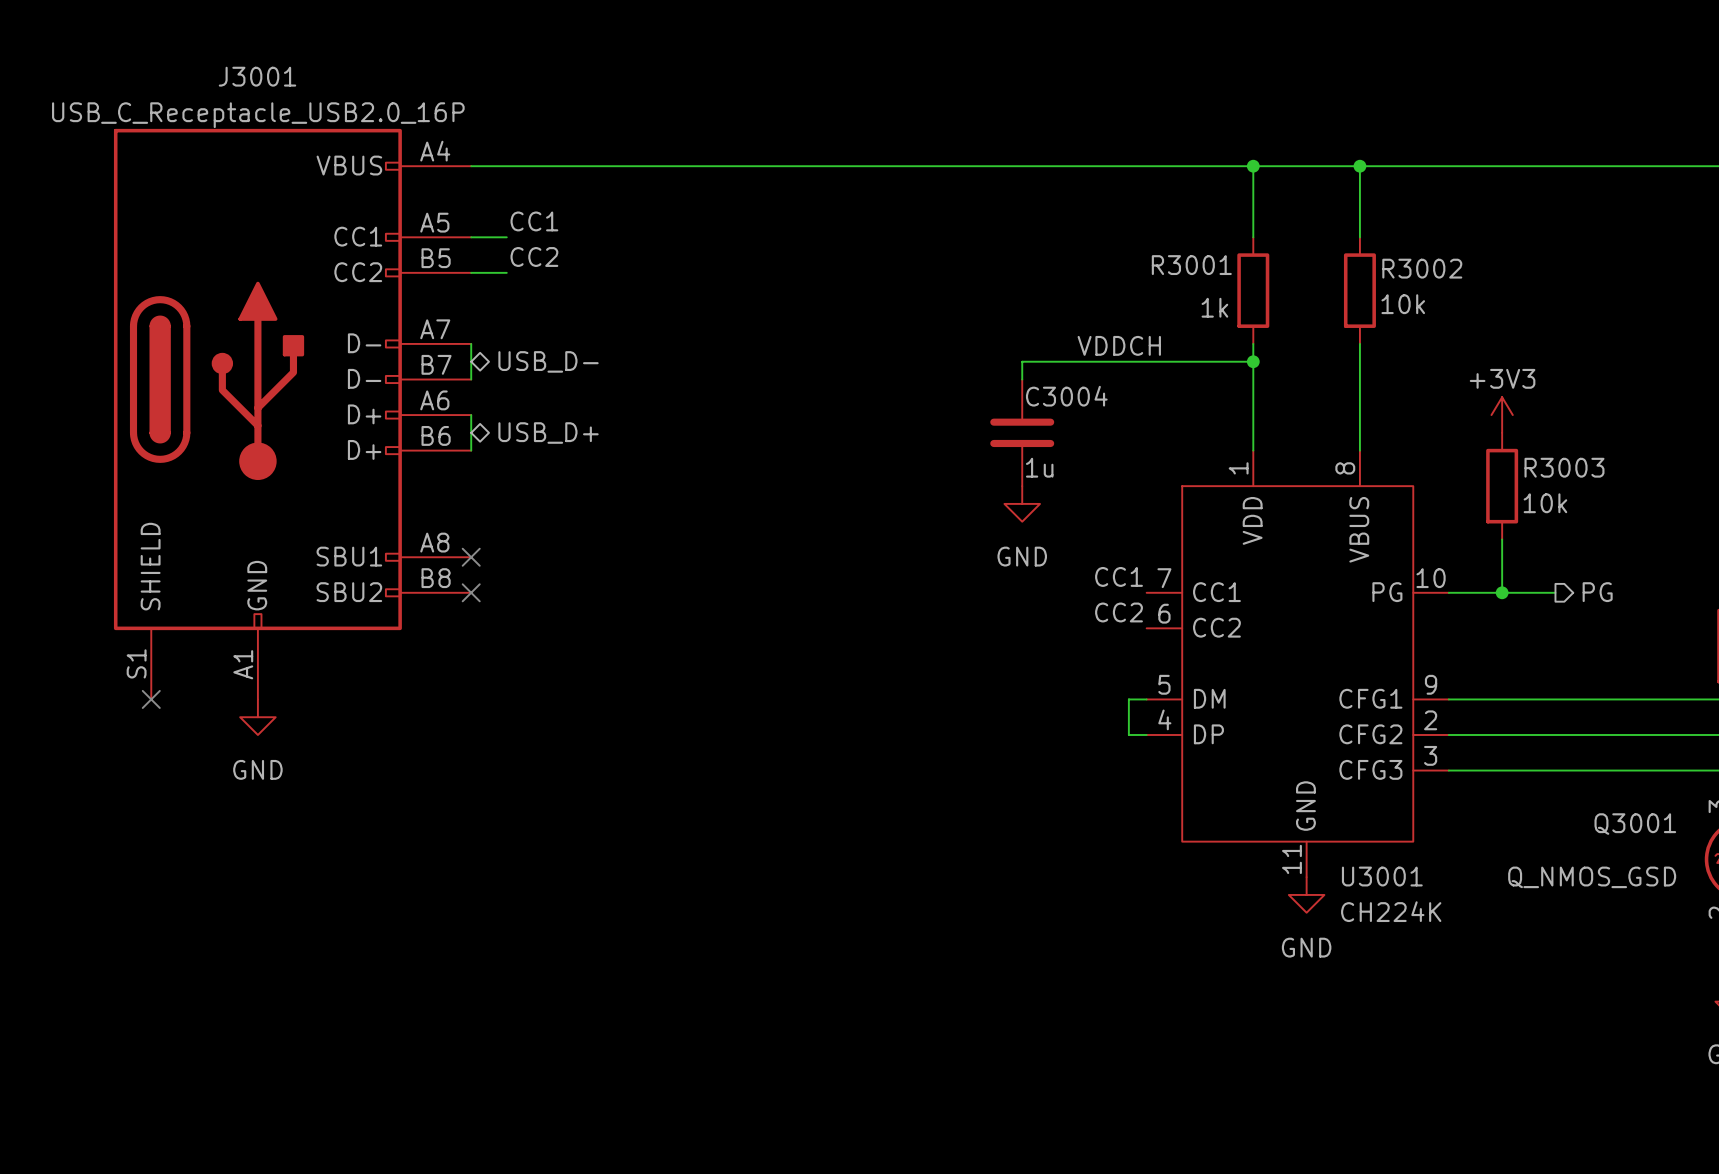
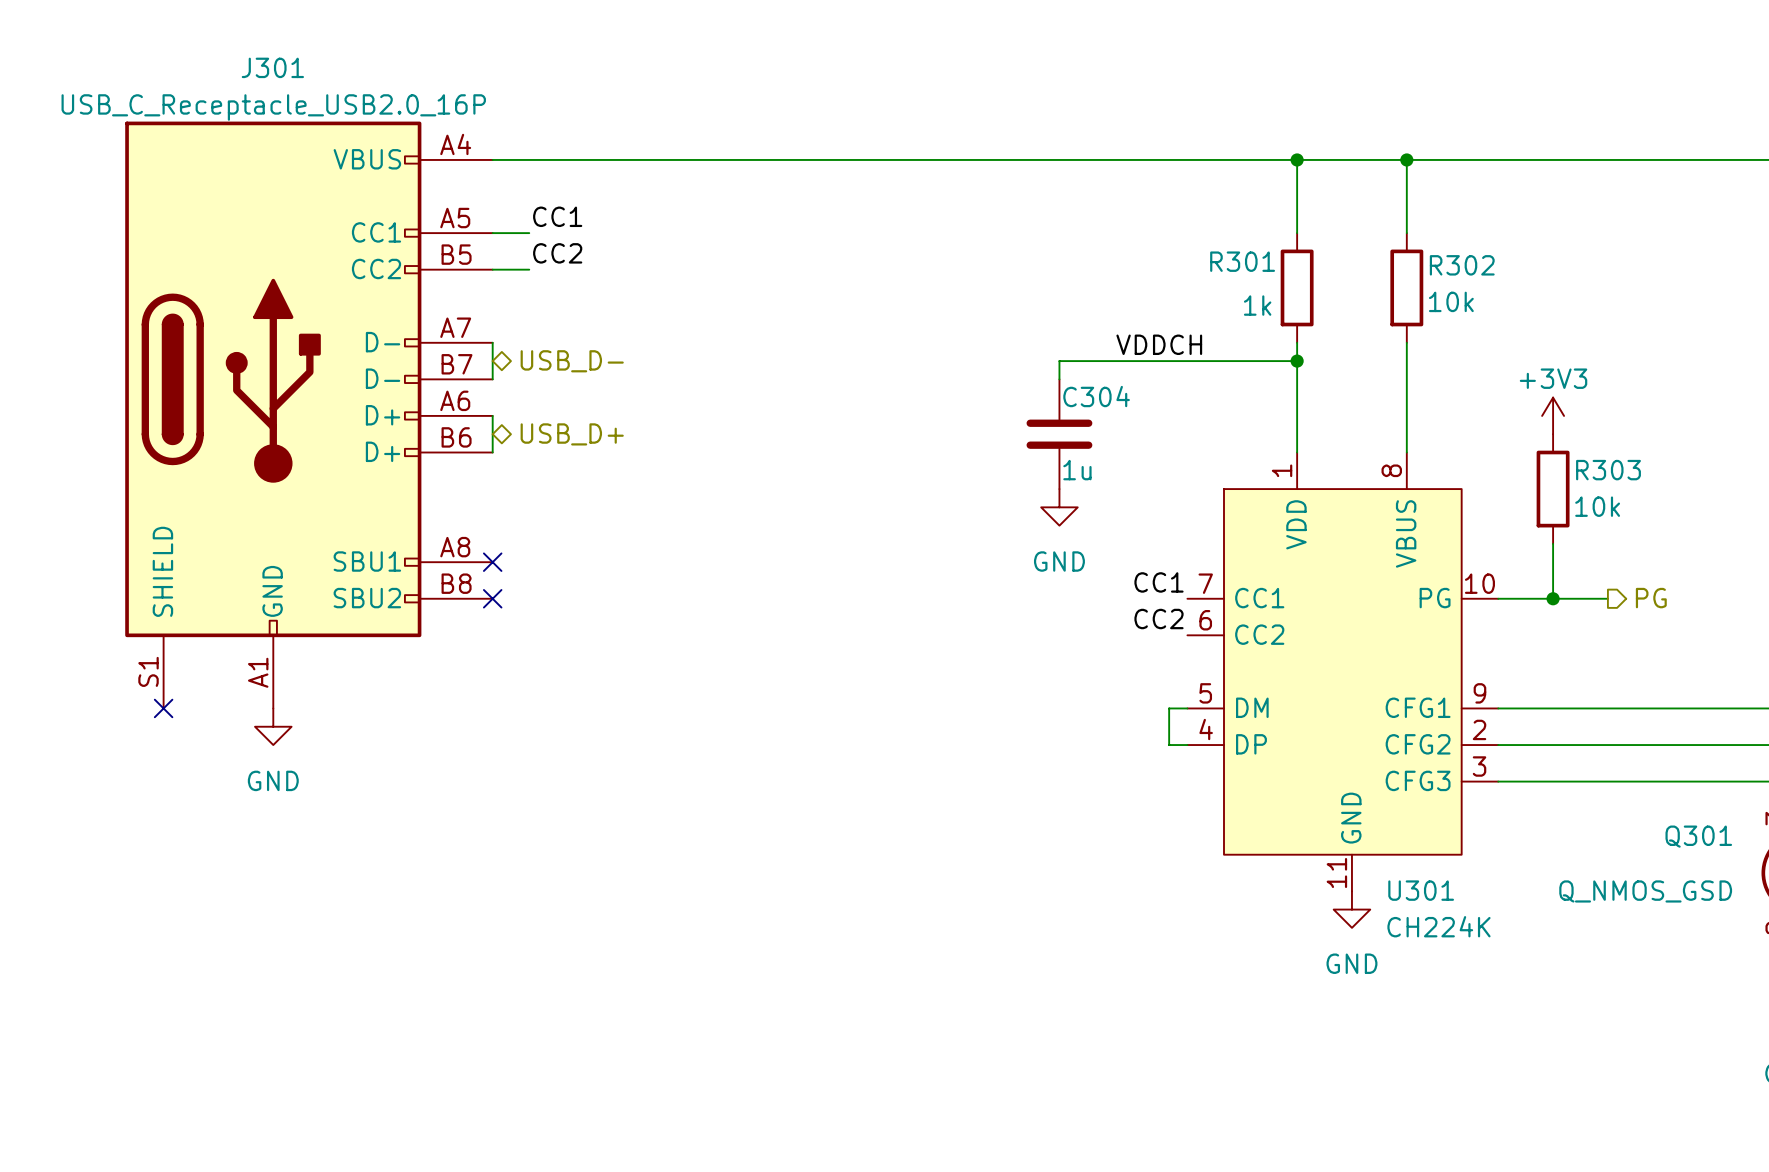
J3001 name: J3001 (257, 76) -> J301 (272, 67)
R3001 name: R3001 (1191, 265) -> R301 (1242, 261)
R3002 name: R3002 (1422, 268) -> R302 (1462, 265)
C3004 name: C3004 (1066, 396) -> C304 (1096, 396)
R3003 name: R3003 (1564, 467) -> R303 (1608, 470)
Q3001 name: Q3001 (1635, 824) -> Q301 (1698, 836)
U3001 name: U3001 (1382, 876) -> U301 (1421, 890)

